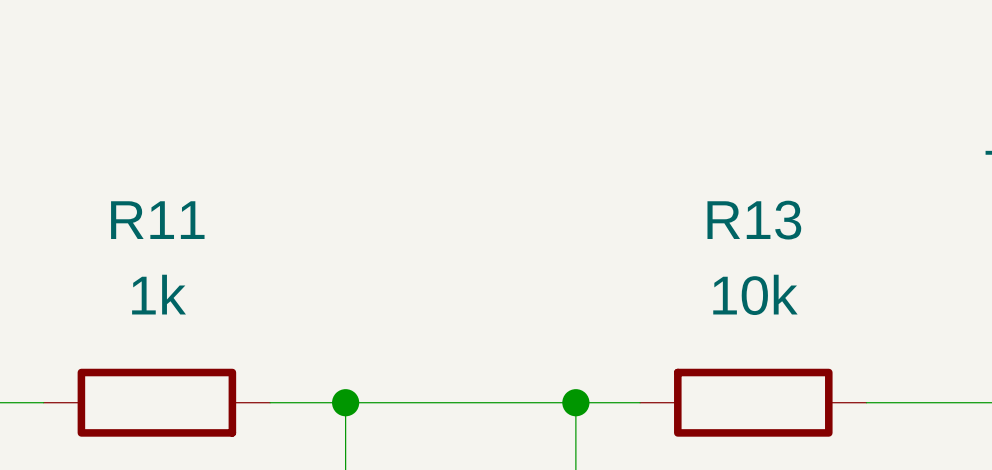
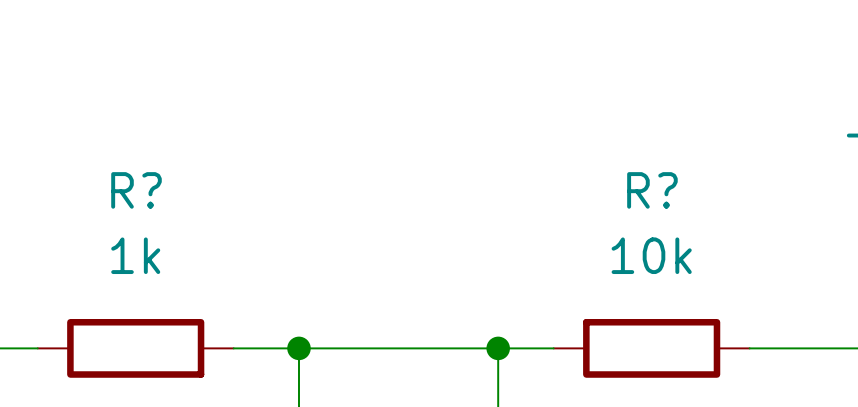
R11 name: R11 (157, 220) -> R? (136, 190)
R13 name: R13 (754, 220) -> R? (652, 190)

